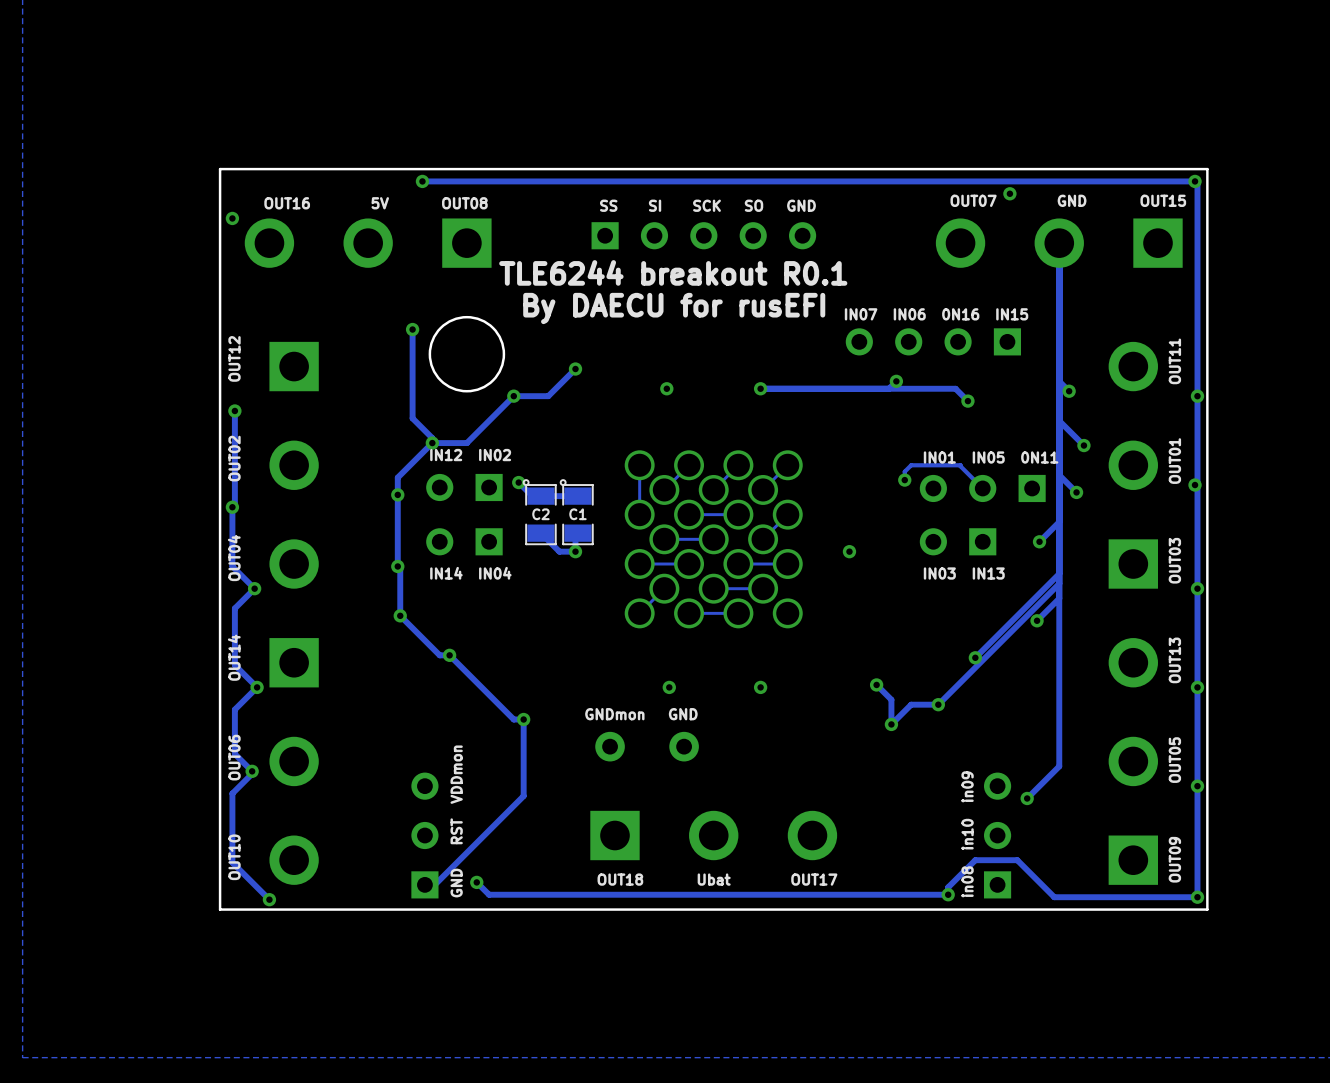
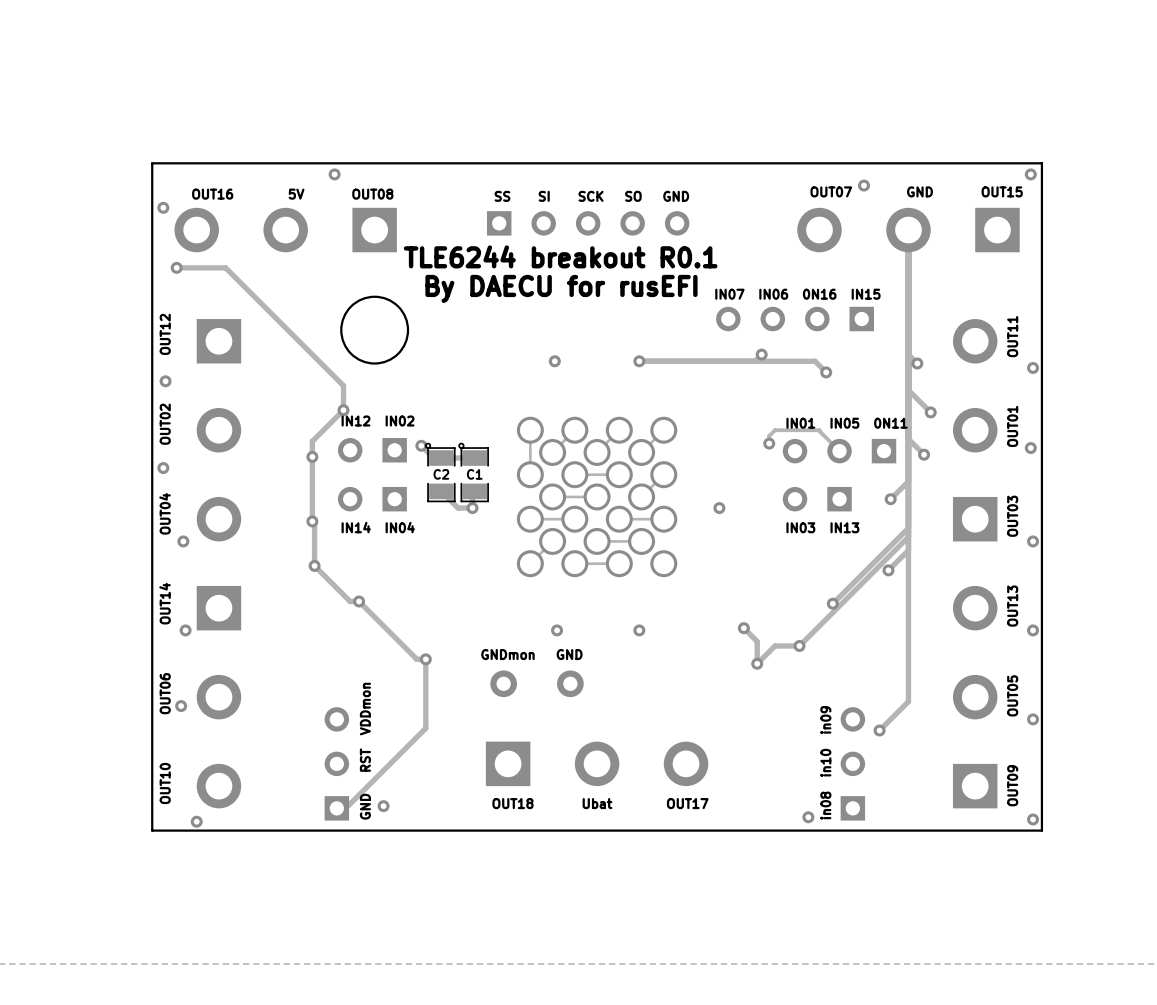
track: (422, 181) (1195, 181) (1197, 183) (1197, 897) (1054, 897) (1017, 860) (975, 860) (948, 887) (948, 894) (489, 894) (476, 882) -> none
via: none -> (176, 267)
track: (412, 329) (412, 418) (432, 438) -> (176, 267) (225, 267) (343, 385) (343, 405)
via: (412, 329) -> none
track: (575, 369) (548, 396) (513, 396) (466, 443) (432, 443) -> none
via: (575, 369) -> none
via: (513, 396) -> none
track: (234, 410) (232, 566) (254, 588) (234, 608) (234, 665) (257, 687) (234, 709) (234, 754) (252, 771) (252, 773) (232, 793) (232, 862) (269, 899) -> none

